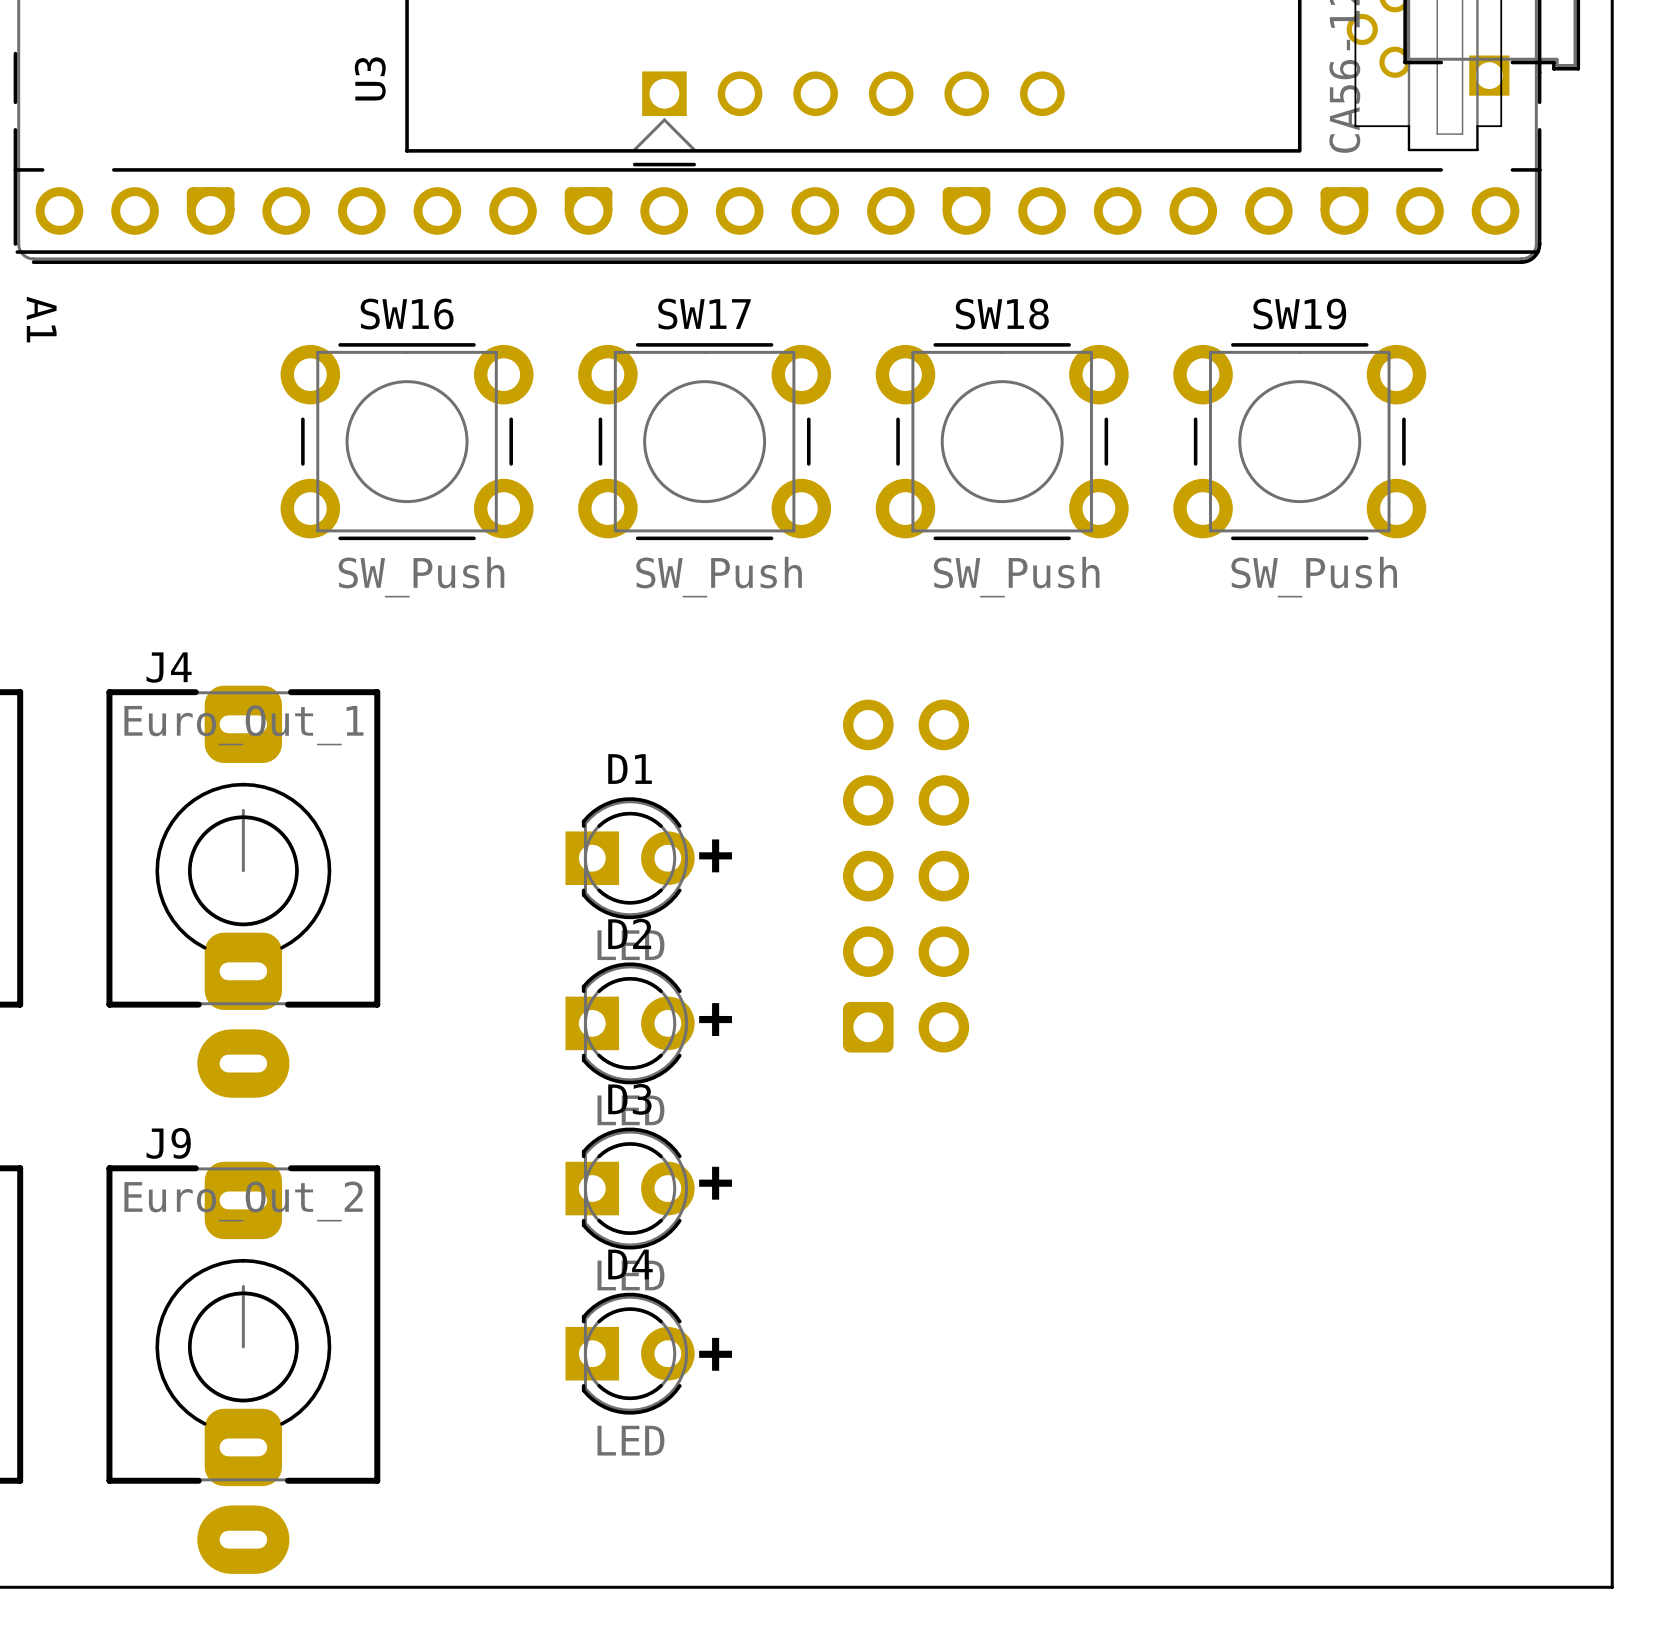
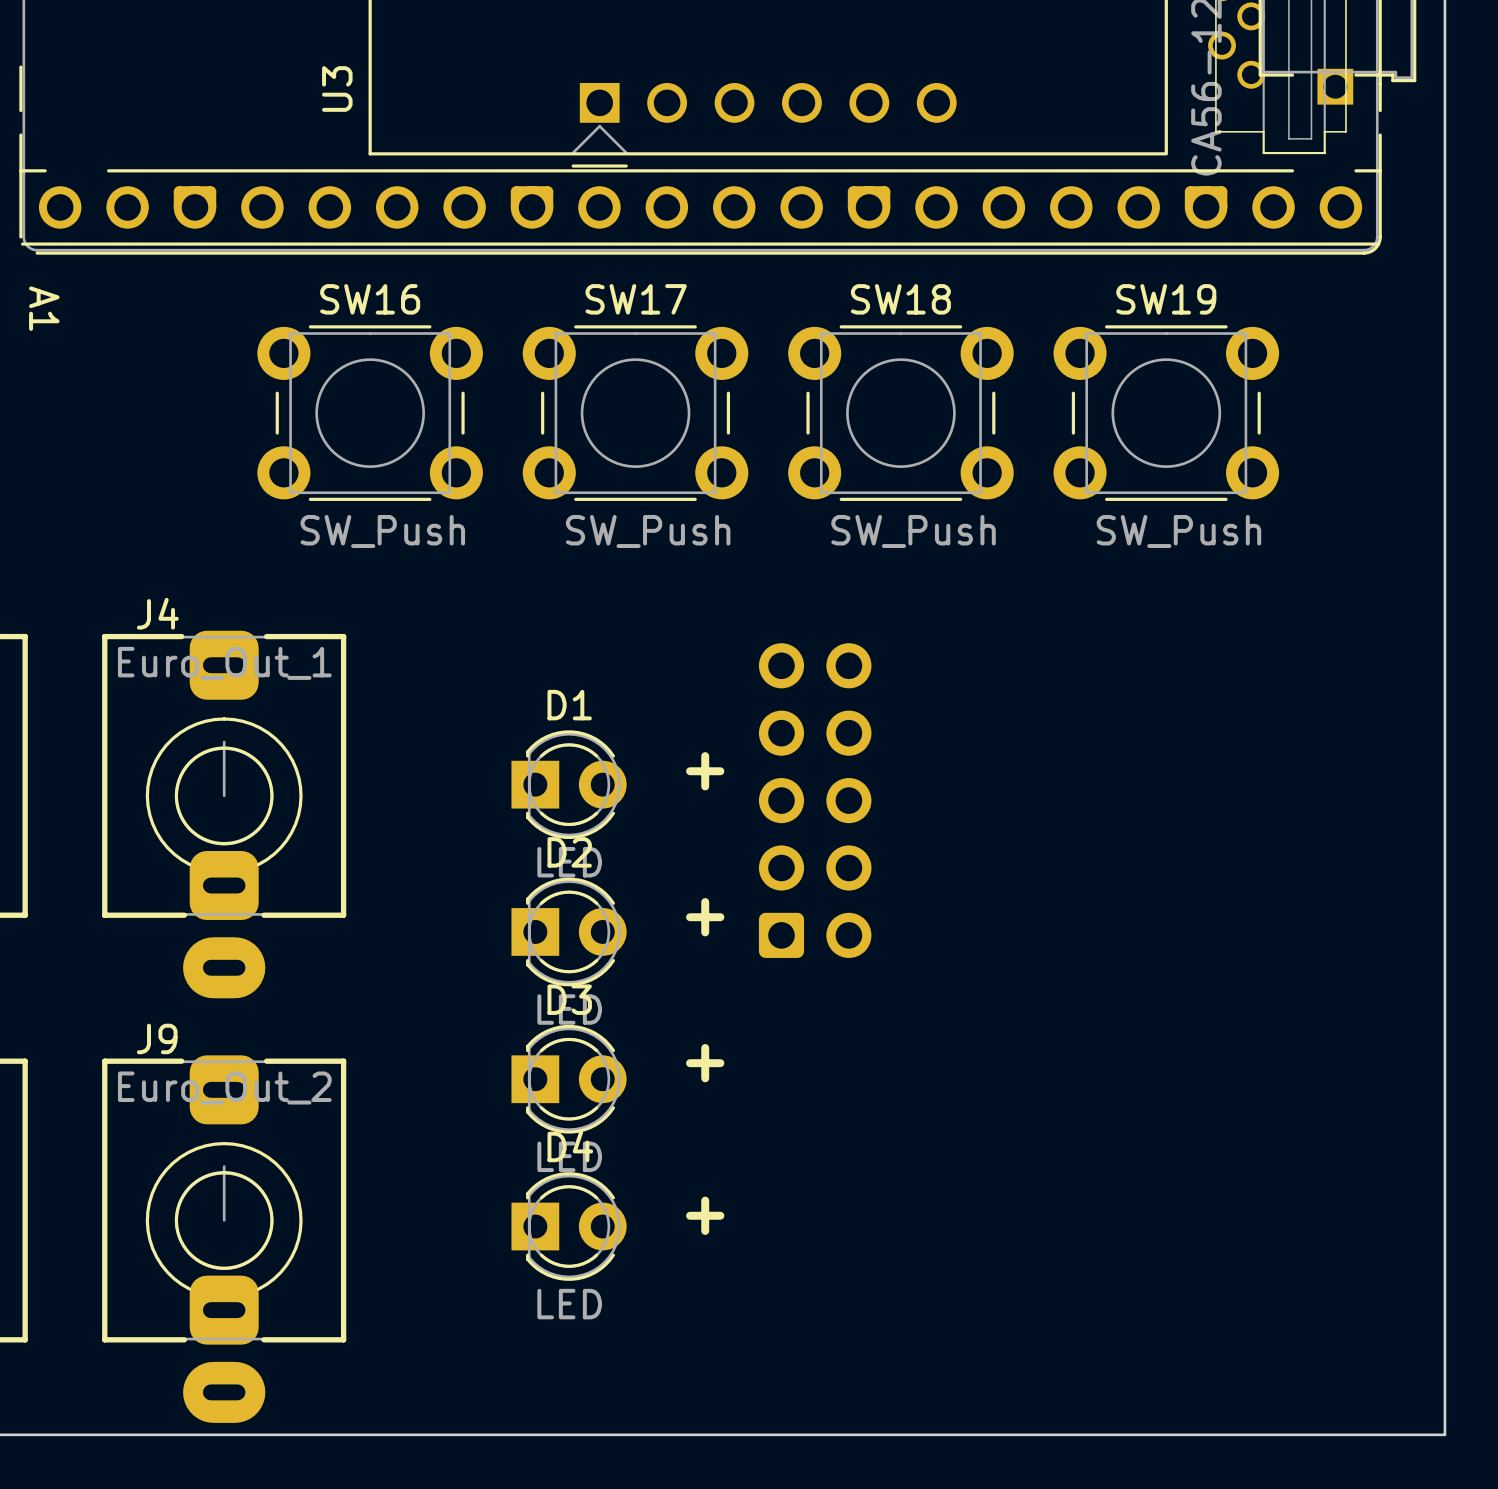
text position: + (715, 855) -> + (705, 771)
text position: + (715, 1019) -> + (705, 917)
text position: + (715, 1183) -> + (705, 1063)
text position: + (715, 1354) -> + (705, 1215)

